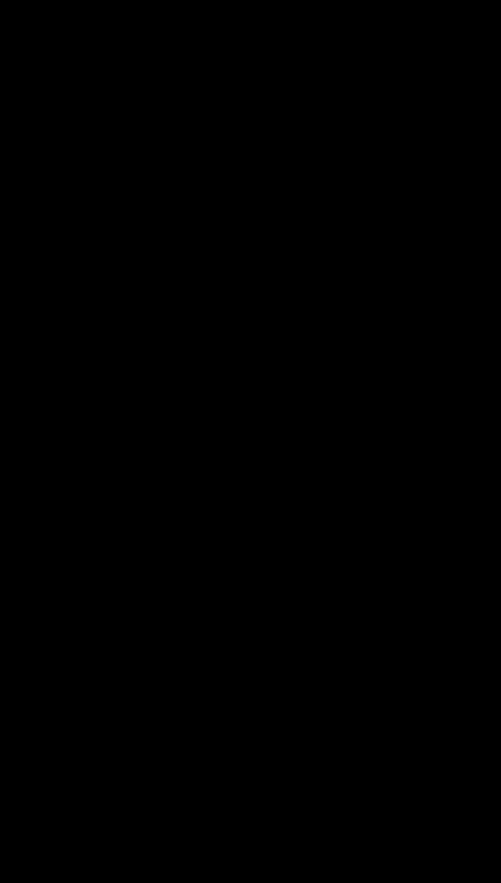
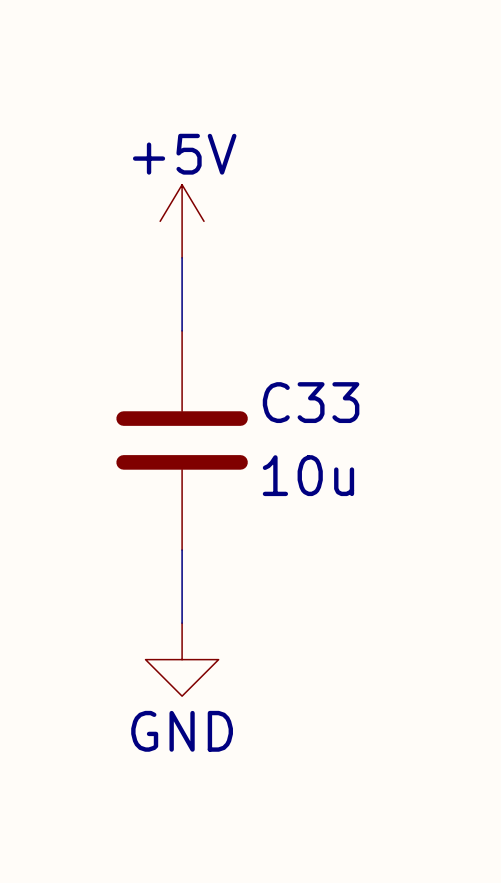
power symbol: none -> +5V (182, 221)
wire: none -> (182, 257) (182, 330)
C33: none -> 10u (182, 440)
wire: none -> (182, 550) (182, 623)
power symbol: none -> GND (182, 659)

